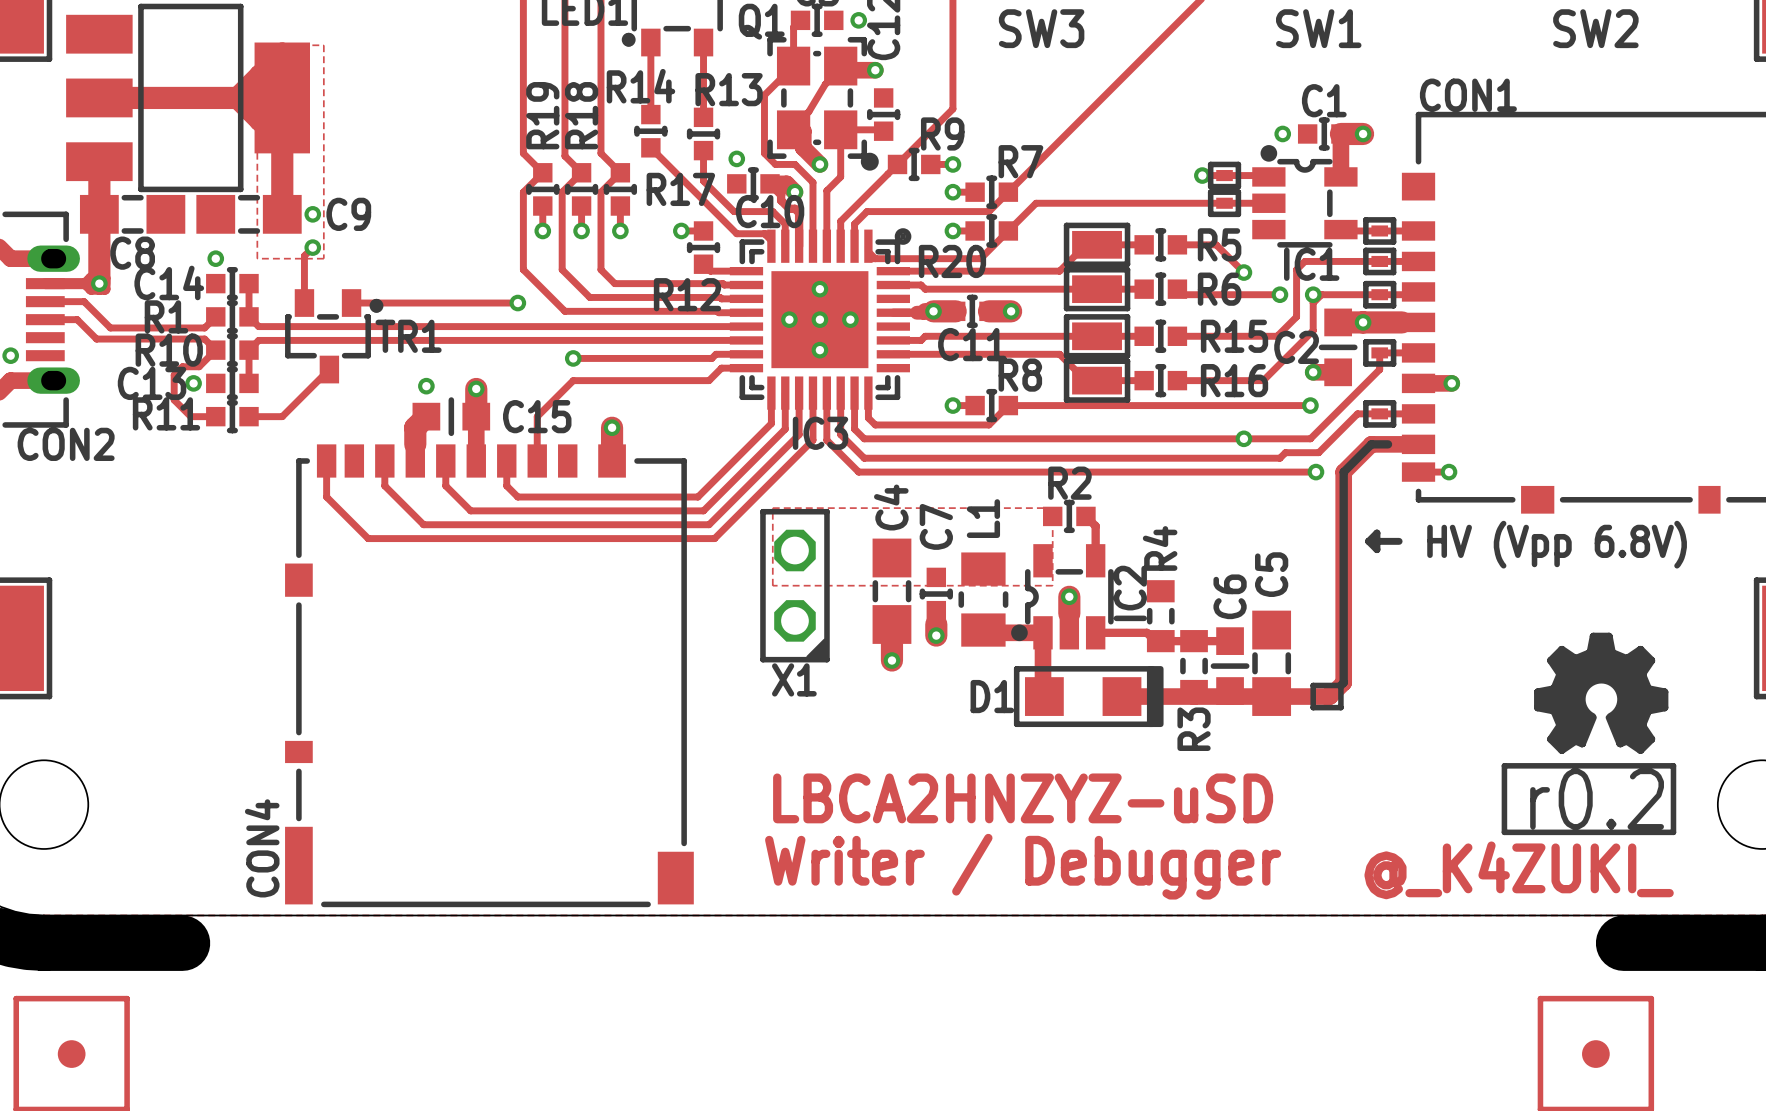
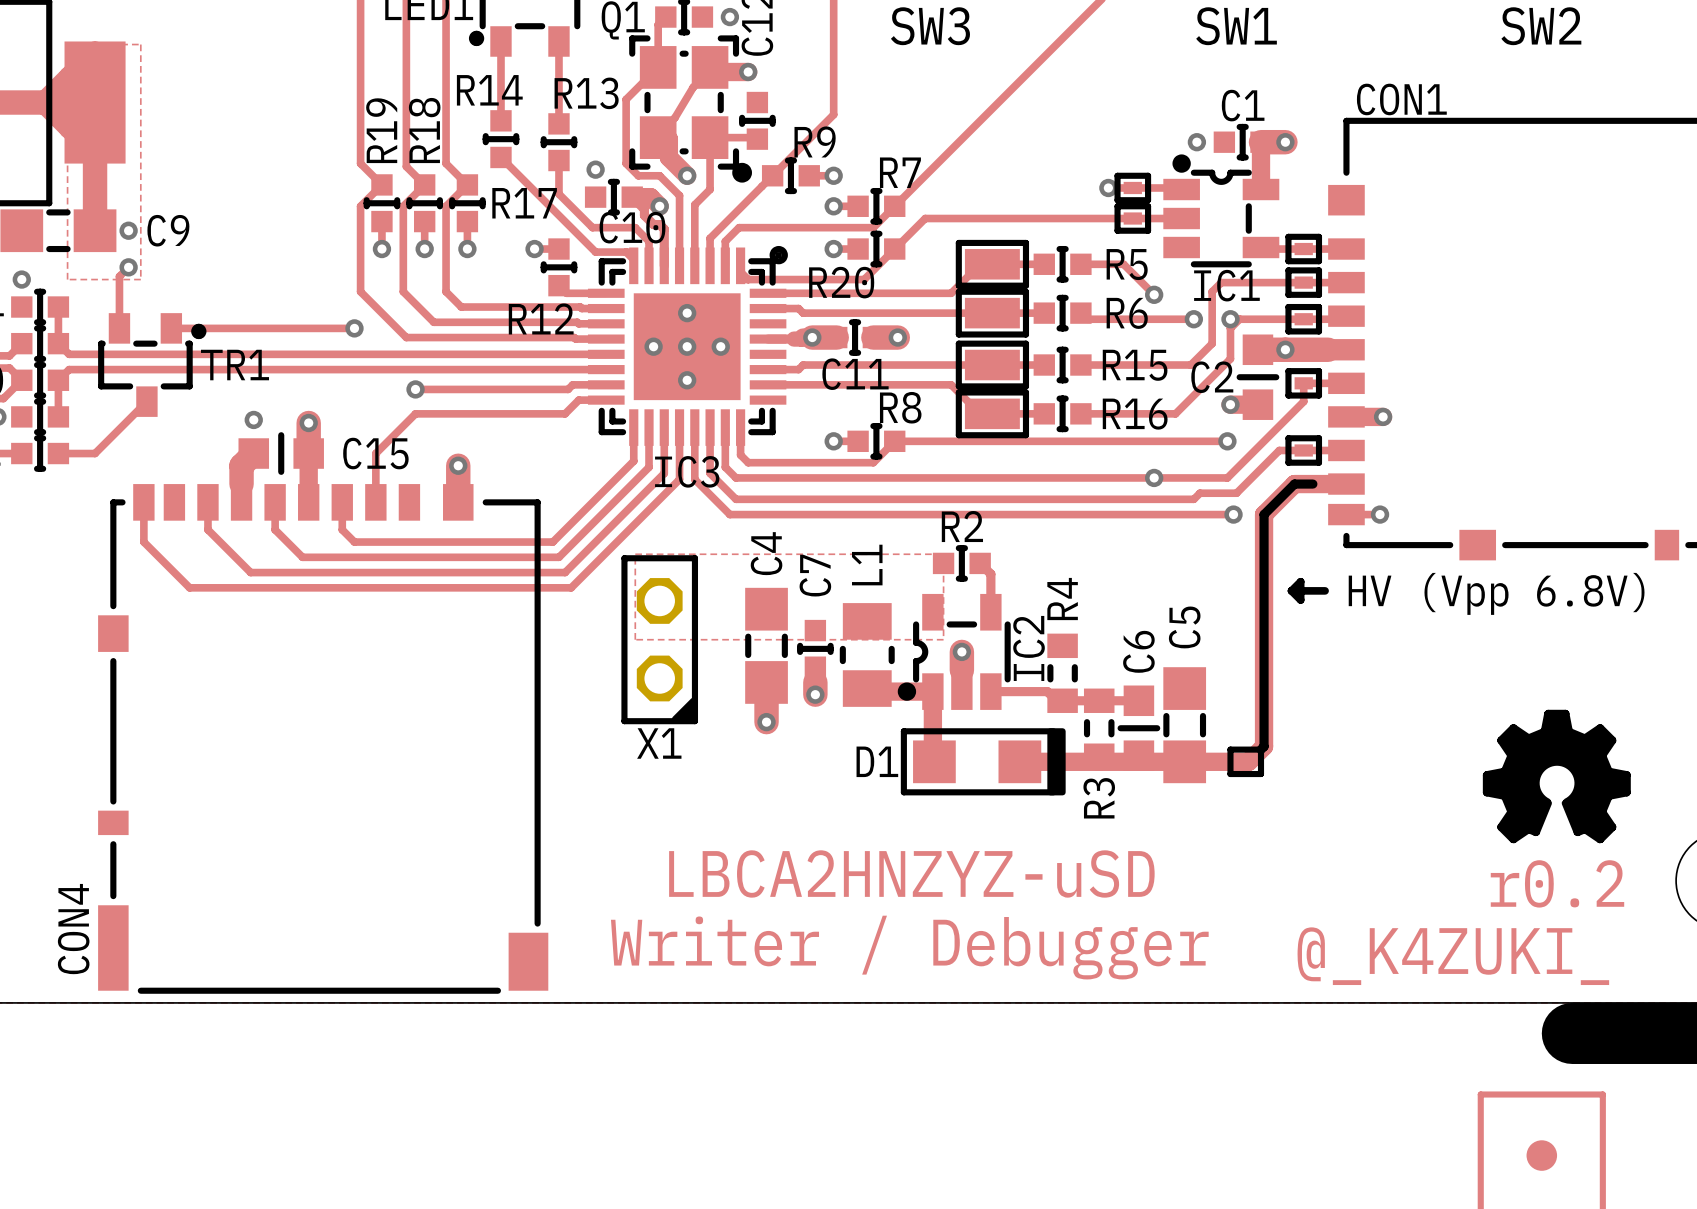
drawing position: (1601, 693) -> (1556, 776)
drawing: [1501, 763, 1677, 836] -> none
text: none -> r0.2 (1557, 883)

